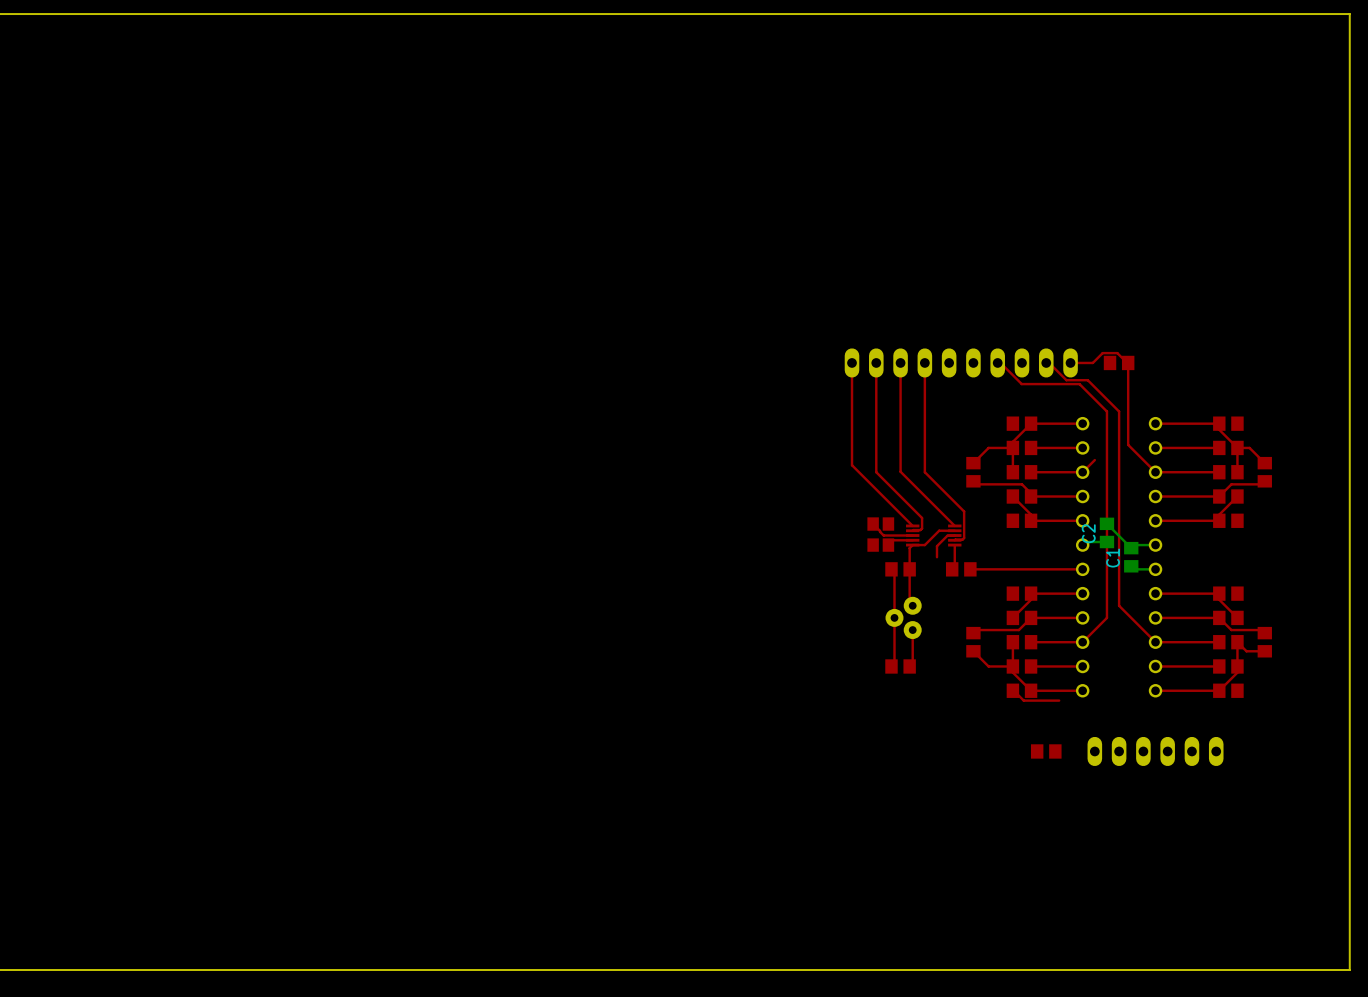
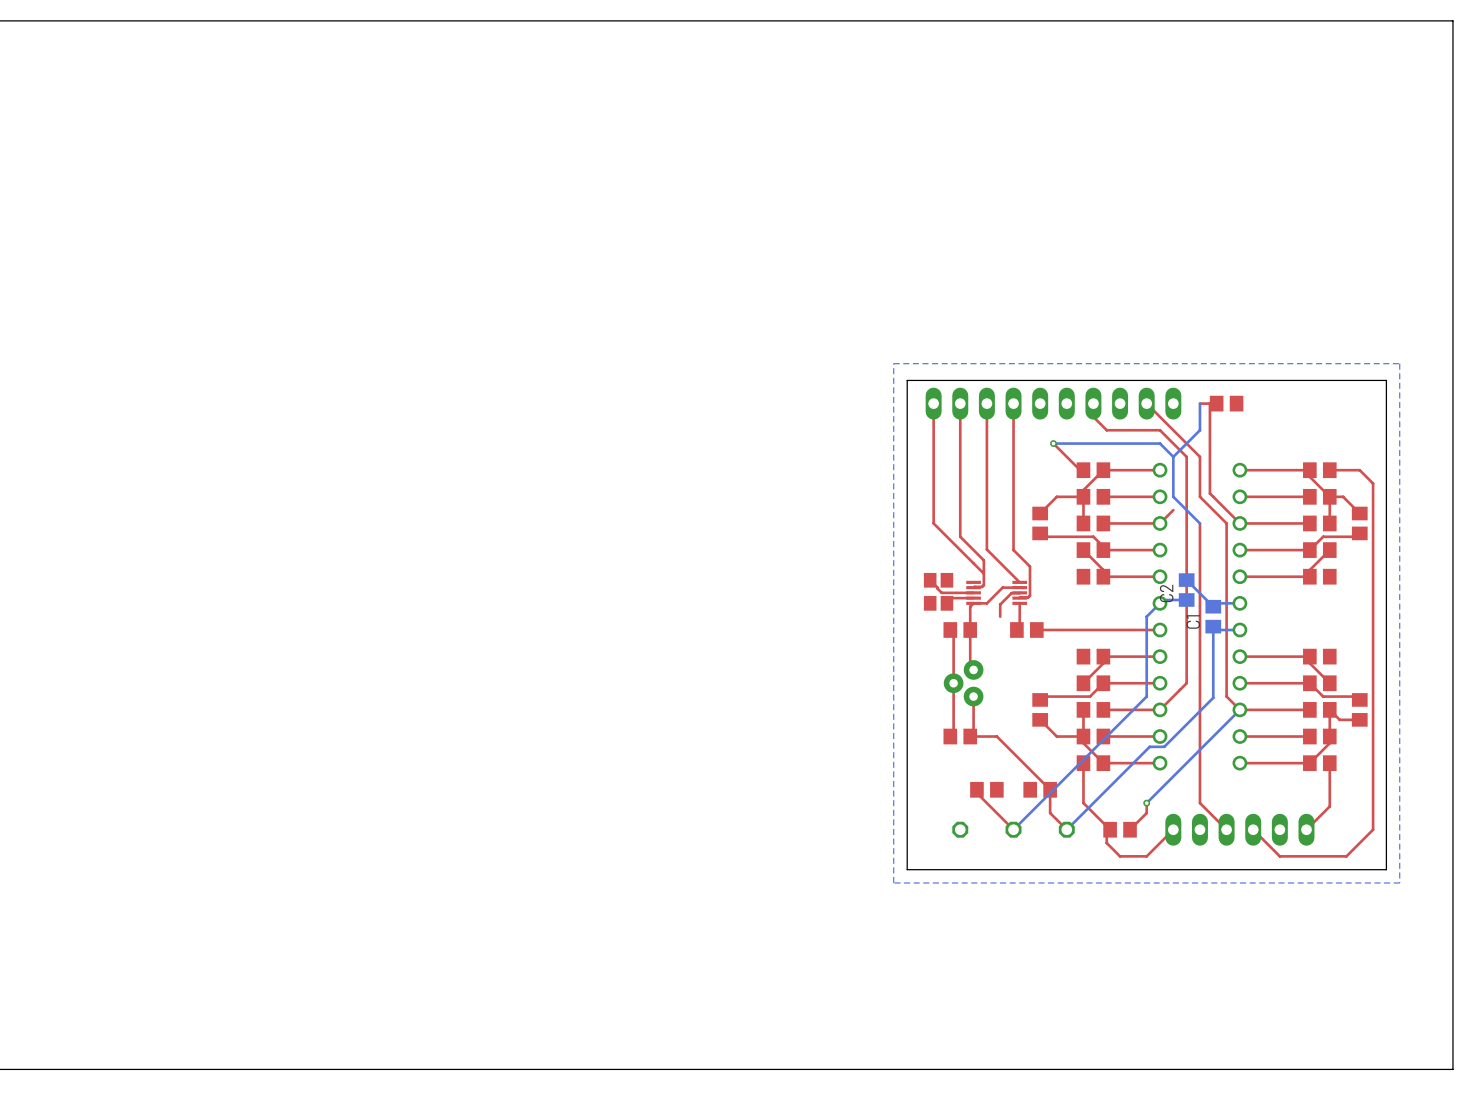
bottom zone outline: none -> (1399, 363) (1399, 883) (893, 883) (893, 363) (1399, 363)
board edge: none -> (1386, 380) (907, 380) (907, 869) (1386, 869) (1386, 380)
top track: (852, 362) (852, 465) (912, 525) -> none
top track: none -> (1013, 403) (1013, 550)
part position: (961, 362) -> (1053, 403)
top track: (997, 362) (1000, 362) (1021, 384) (1079, 384) (1082, 387) -> (1093, 403) (1093, 416) (1106, 430) (1160, 430)
top track: (1046, 362) (1049, 362) (1066, 380) (1087, 380) -> (1146, 403) (1165, 422)
bottom track: none -> (1199, 403) (1199, 430) (1173, 456)
part position: (1119, 362) -> (1226, 403)
top track: (1127, 362) (1117, 353) (1102, 353) (1092, 362) (1070, 362) -> (1208, 403) (1199, 403)
top track: none -> (1053, 443) (1080, 470) (1083, 470)
bottom track: none -> (1053, 443) (1160, 443) (1173, 456)
via: none -> (1053, 443)
bottom track: none -> (1173, 456) (1173, 496) (1199, 523)
top track: none -> (1329, 470) (1359, 470) (1373, 483) (1373, 829) (1346, 856) (1279, 856) (1253, 829)
top track: (1119, 447) (1119, 472) -> (1199, 496) (1226, 523) (1226, 696)
top track: (900, 471) (924, 496) -> (960, 522) (960, 536) (983, 560) (983, 573)
top track: (924, 472) (949, 496) -> (986, 523) (986, 549)
bottom track: none -> (1160, 603) (1146, 616) (1146, 696) (1013, 829)
bottom track: none -> (1213, 626) (1213, 697) (1164, 746) (1149, 746) (1066, 829)
top track: (1119, 605) (1143, 630) -> (1199, 669) (1199, 803) (1226, 829)
bottom track: none -> (1239, 709) (1146, 803)
top track: none -> (970, 736) (996, 736) (1050, 789) (1050, 813) (1066, 829)
top track: (1012, 690) (1023, 700) (1059, 700) -> (1083, 763) (1083, 803) (1110, 829) (1106, 833) (1106, 843) (1120, 856) (1146, 856) (1173, 829)
top track: none -> (1329, 763) (1329, 806) (1306, 829)
top track: none -> (976, 789) (976, 793) (1013, 829)
part: none -> (986, 789)
part: none -> (1040, 789)
top track: none -> (1146, 803) (1146, 813) (1130, 829)
via: none -> (1146, 803)
part: none -> (960, 829)
part: none -> (1013, 829)
part: none -> (1066, 829)

